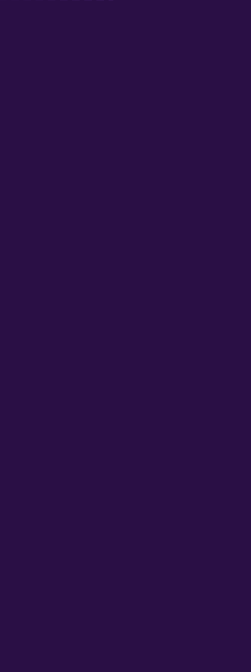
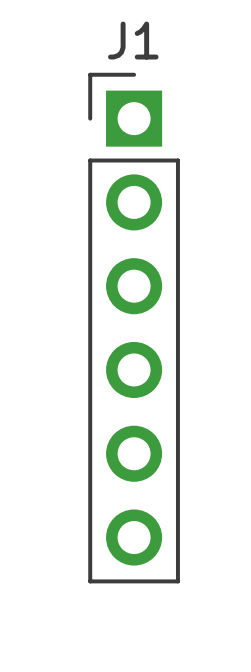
J1: none -> (134, 328)

